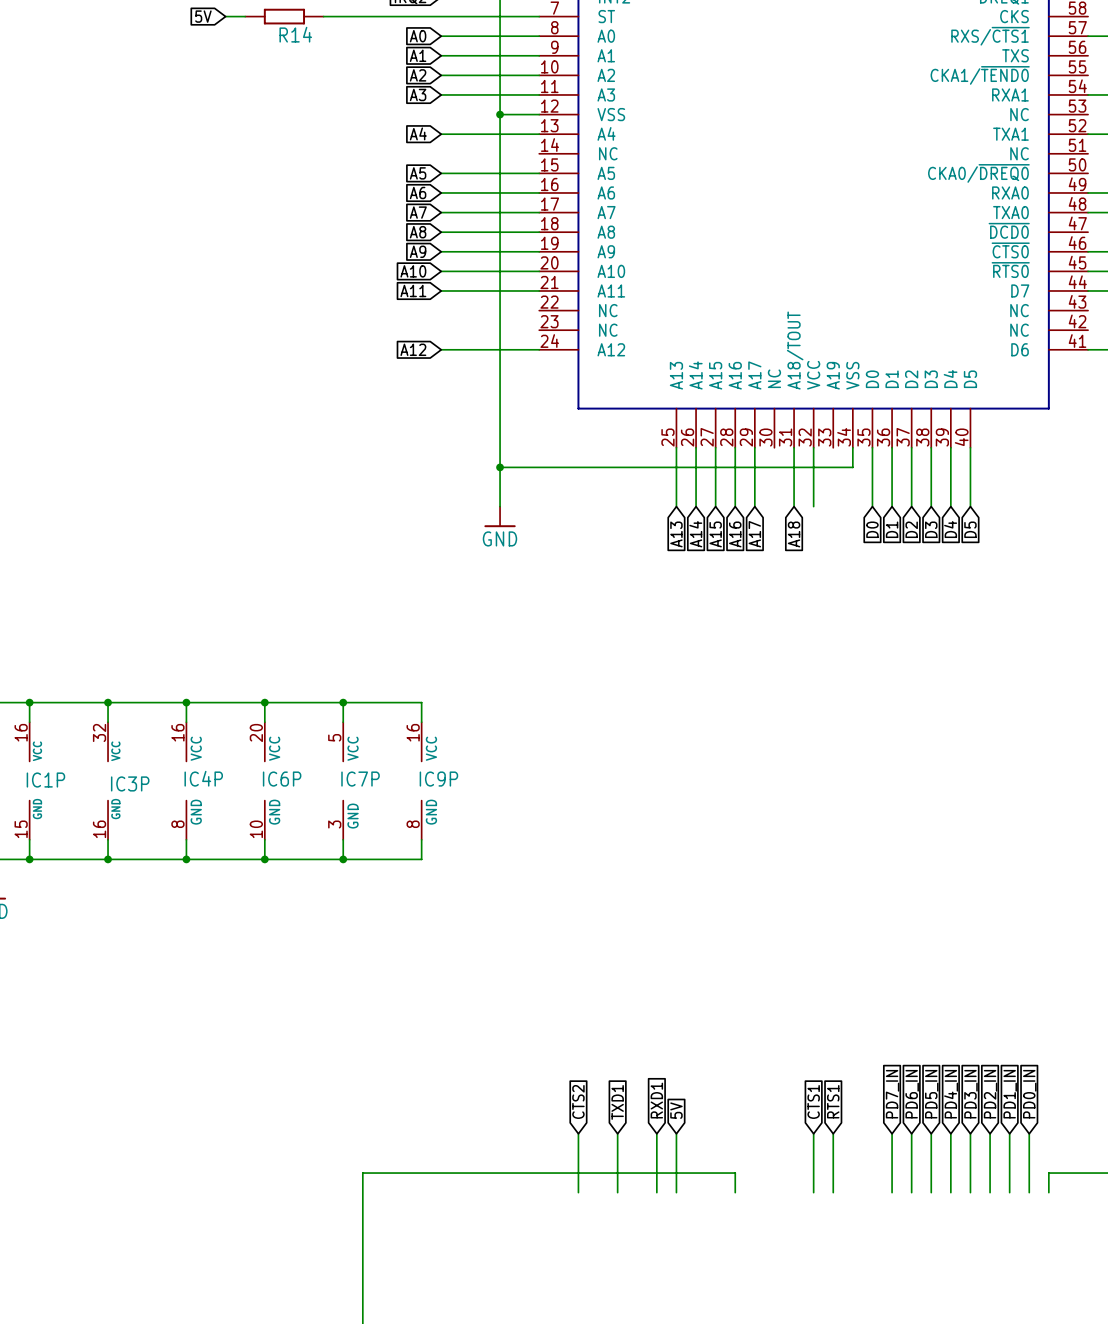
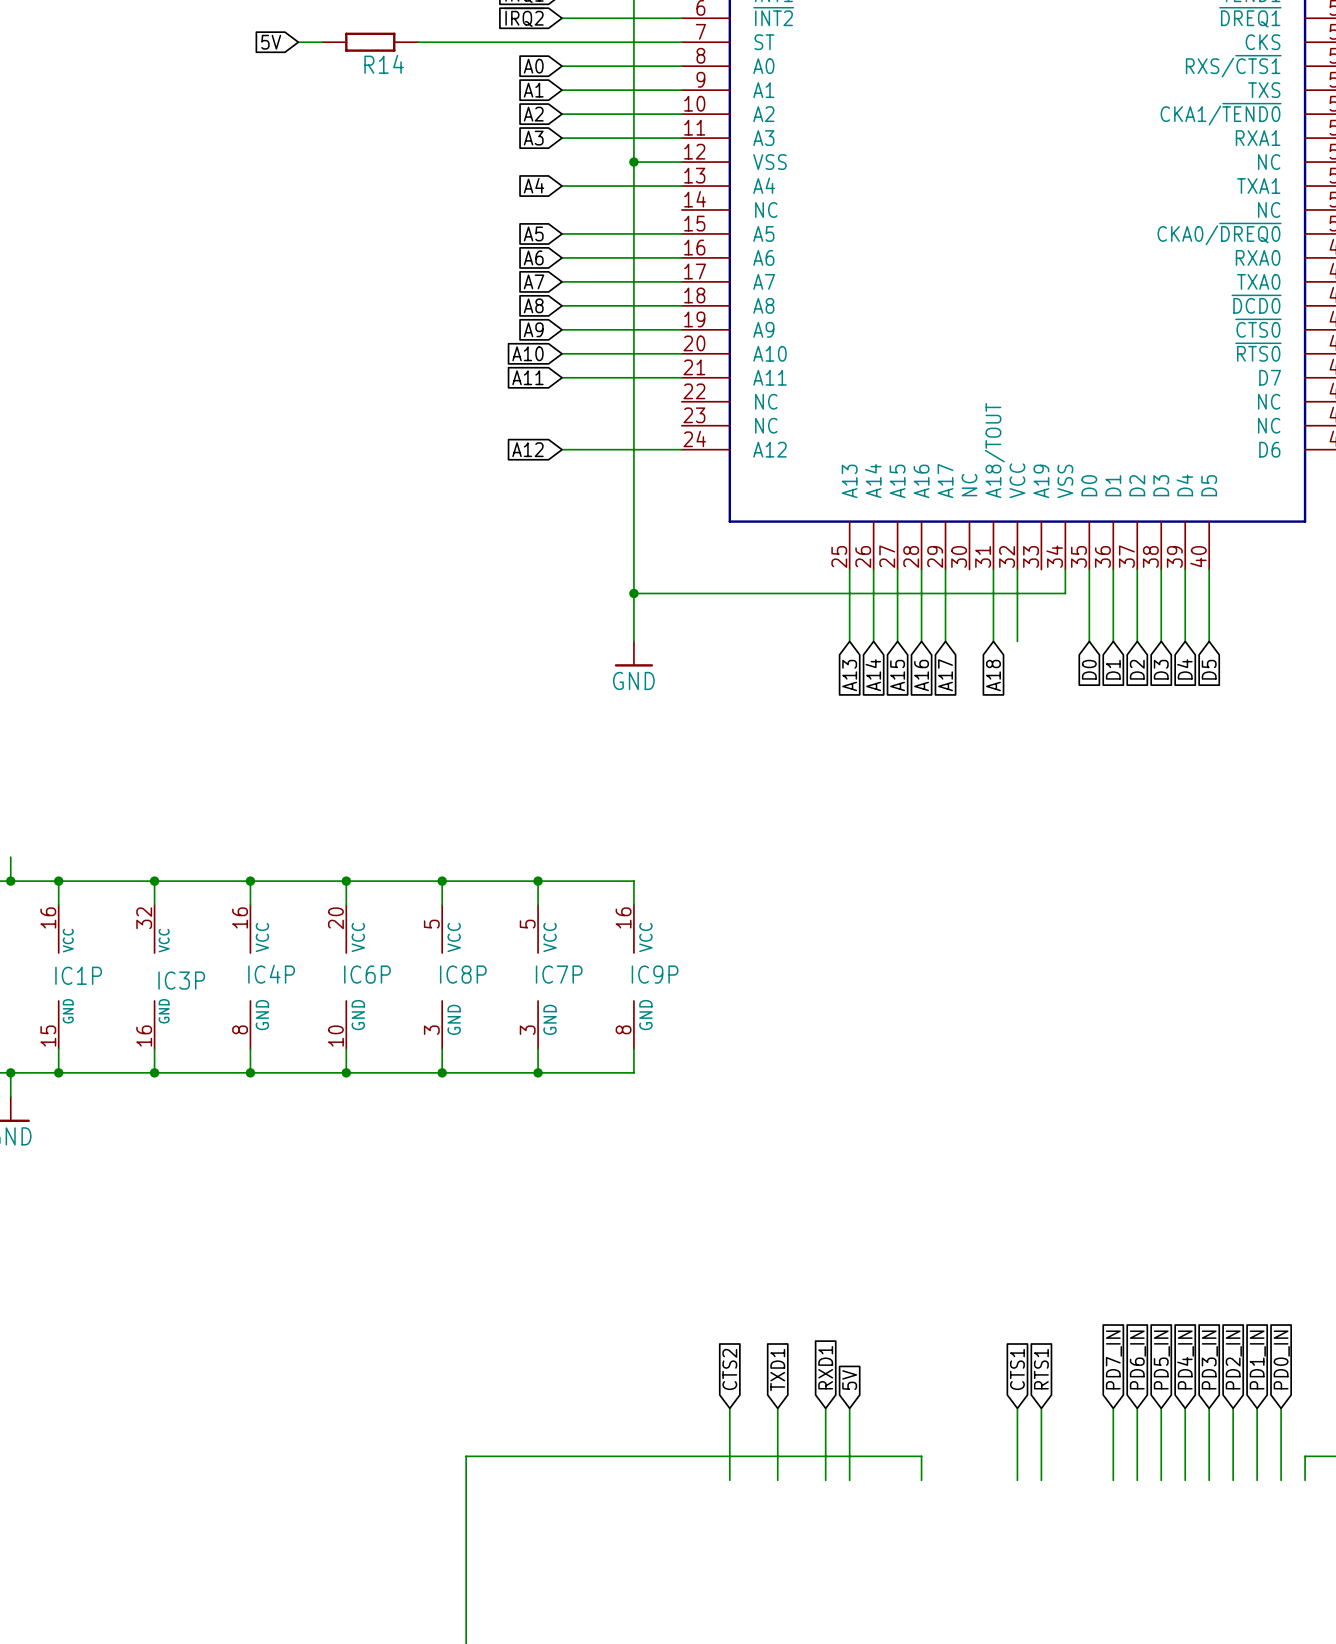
wire: none -> (538, 881) (633, 881) (633, 905)
junction: none -> (538, 881)
IC7P name: IC7P (360, 779) -> IC8P (463, 974)
IC9P position: (421, 781) -> (633, 976)
IC7P: none -> (538, 976)
wire: none -> (633, 1048) (633, 1072) (538, 1072)
junction: none -> (538, 1072)

